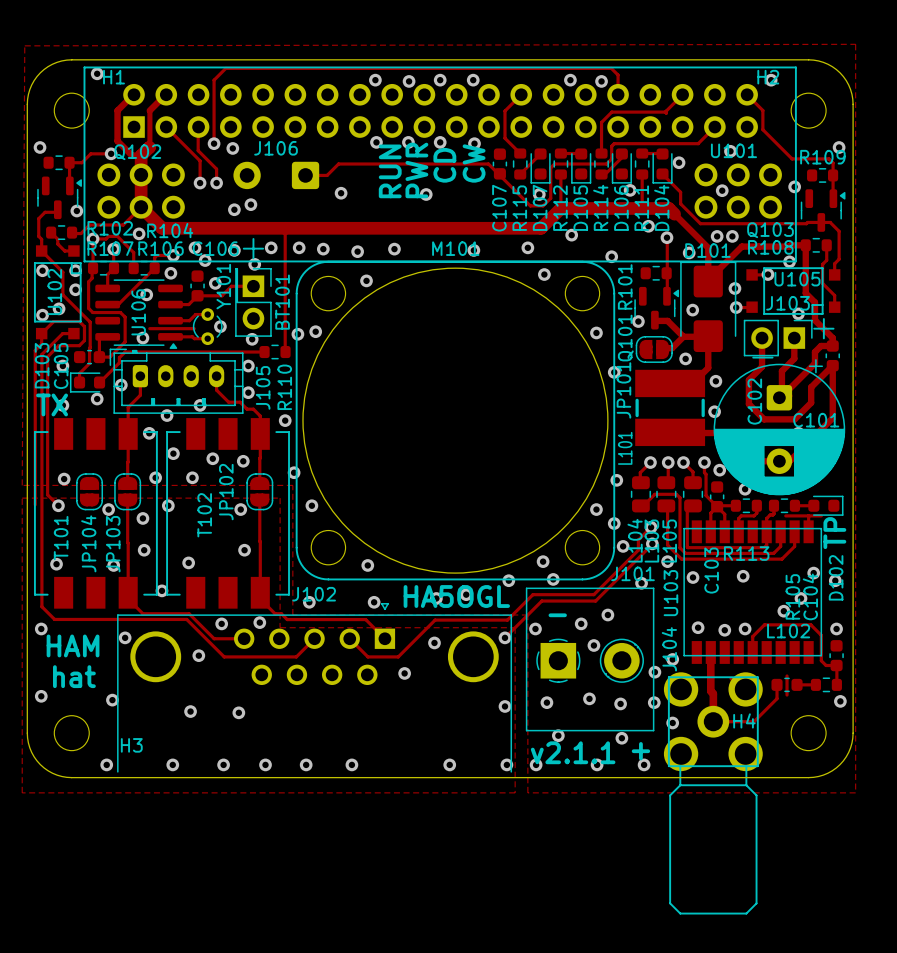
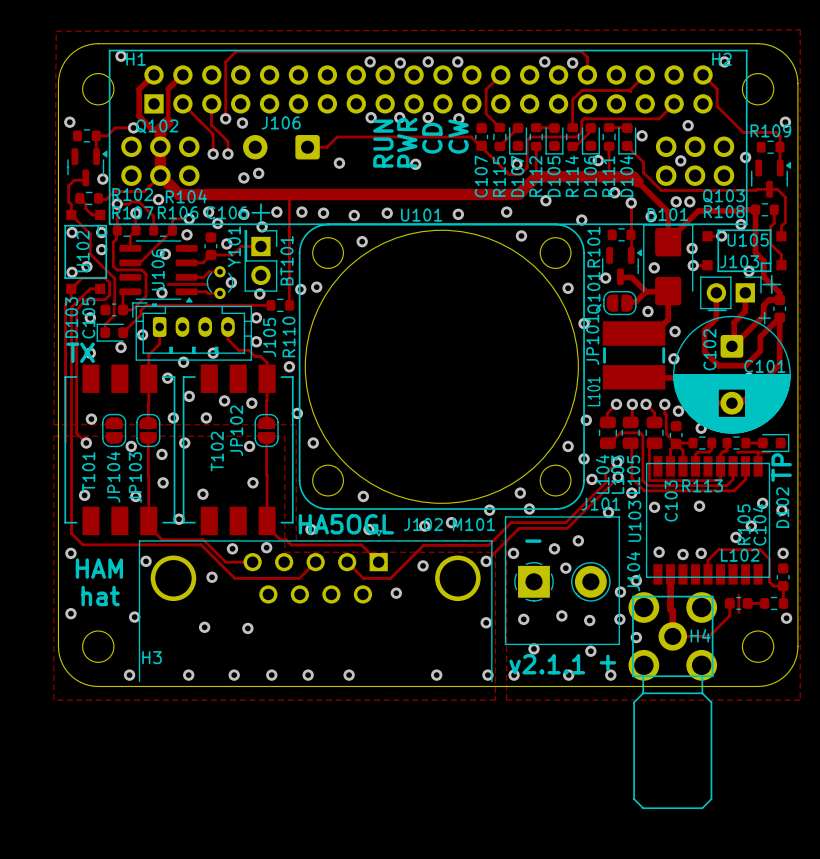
U101 name position: U101 (733, 150) -> U101 (421, 215)
M101 name position: M101 (455, 248) -> M101 (473, 524)
J102 name position: J102 (314, 594) -> J102 (423, 524)
text position: HA5OGL (456, 596) -> HA5OGL (346, 524)

